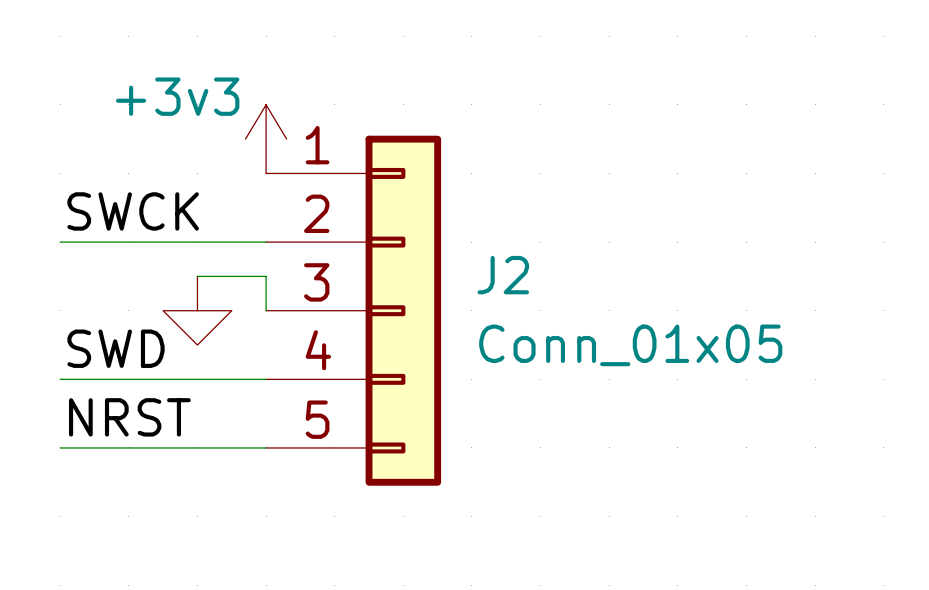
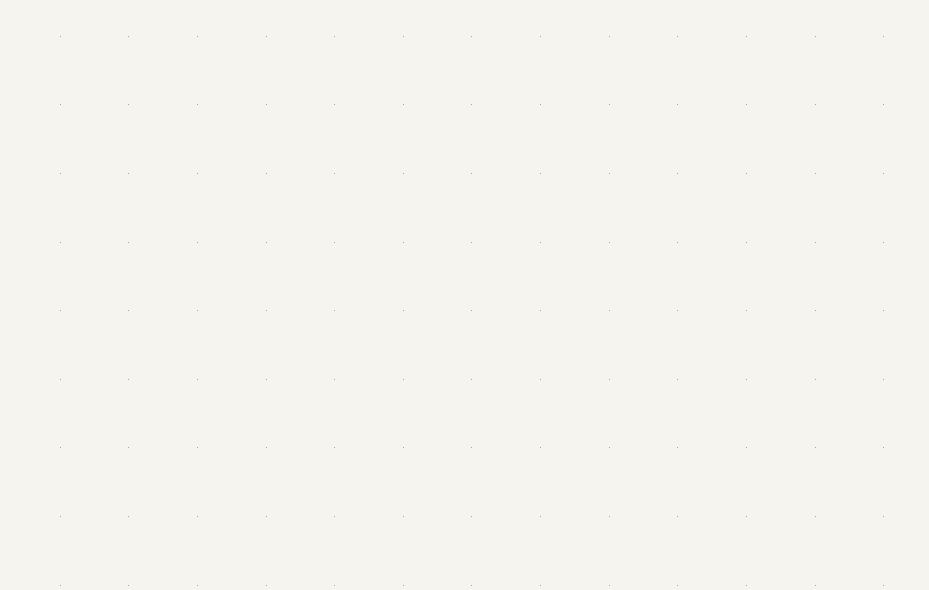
power symbol: +3v3 (266, 139) -> none
label: SWCK (133, 211) -> none
wire: (60, 242) (266, 242) -> none
wire: (197, 276) (266, 276) (266, 310) -> none
power symbol: (197, 310) -> none
J2: Conn_01x05 (353, 310) -> none
label: SWD (116, 348) -> none
wire: (60, 379) (266, 379) -> none
label: NRST (129, 417) -> none
wire: (60, 447) (266, 447) -> none

